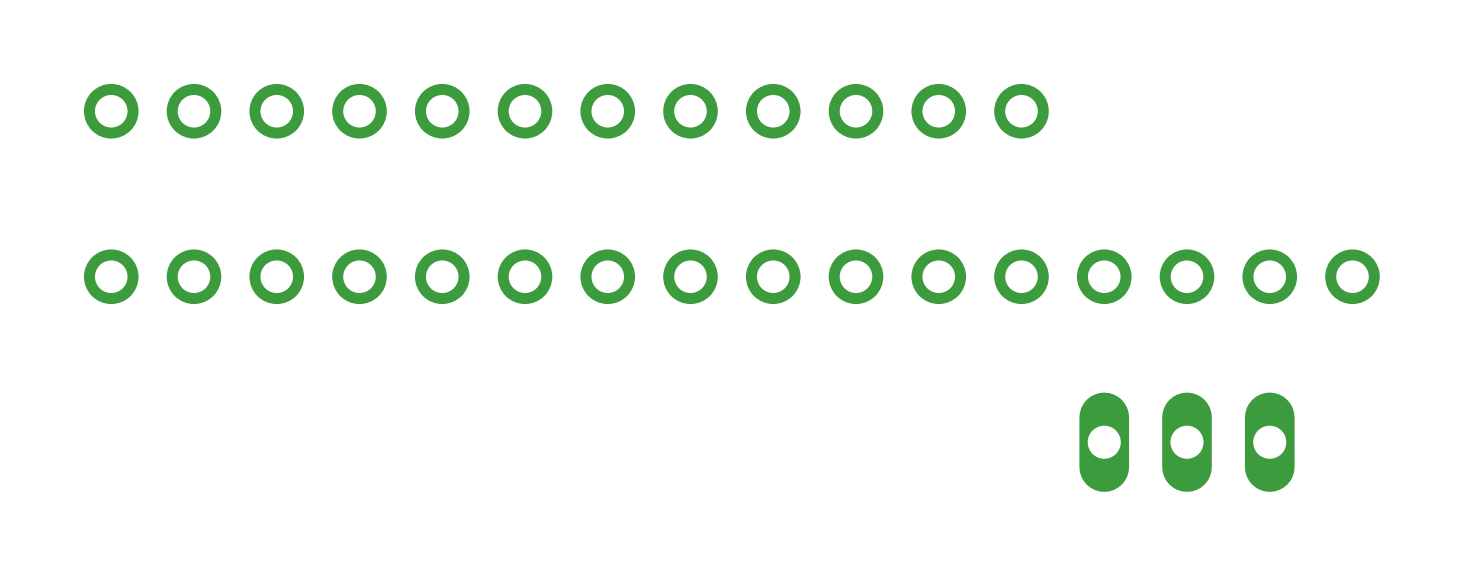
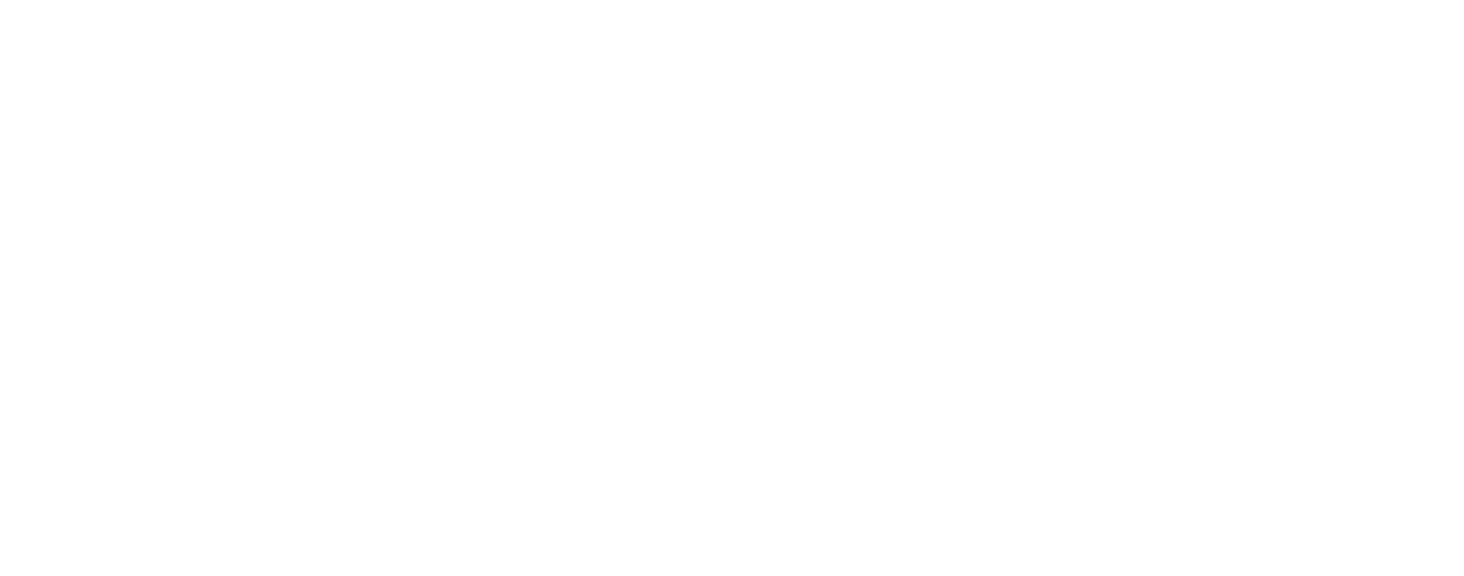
part: (566, 111) -> none
part: (731, 276) -> none
part: (1186, 442) -> none

